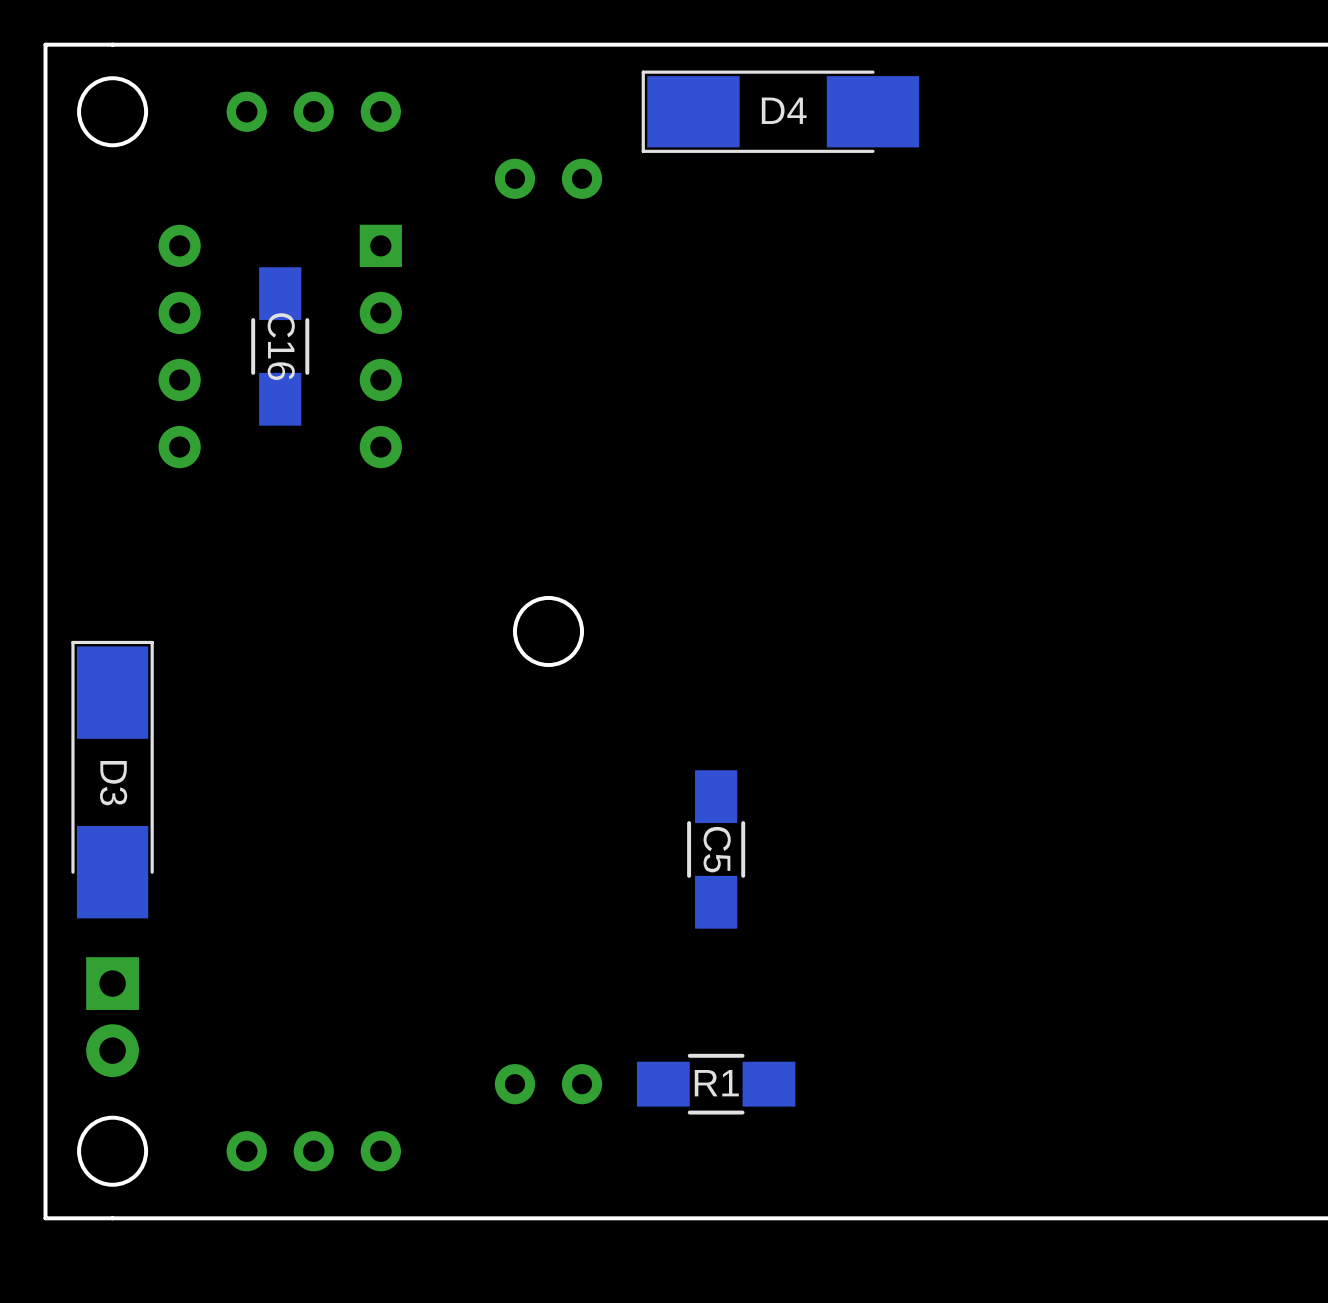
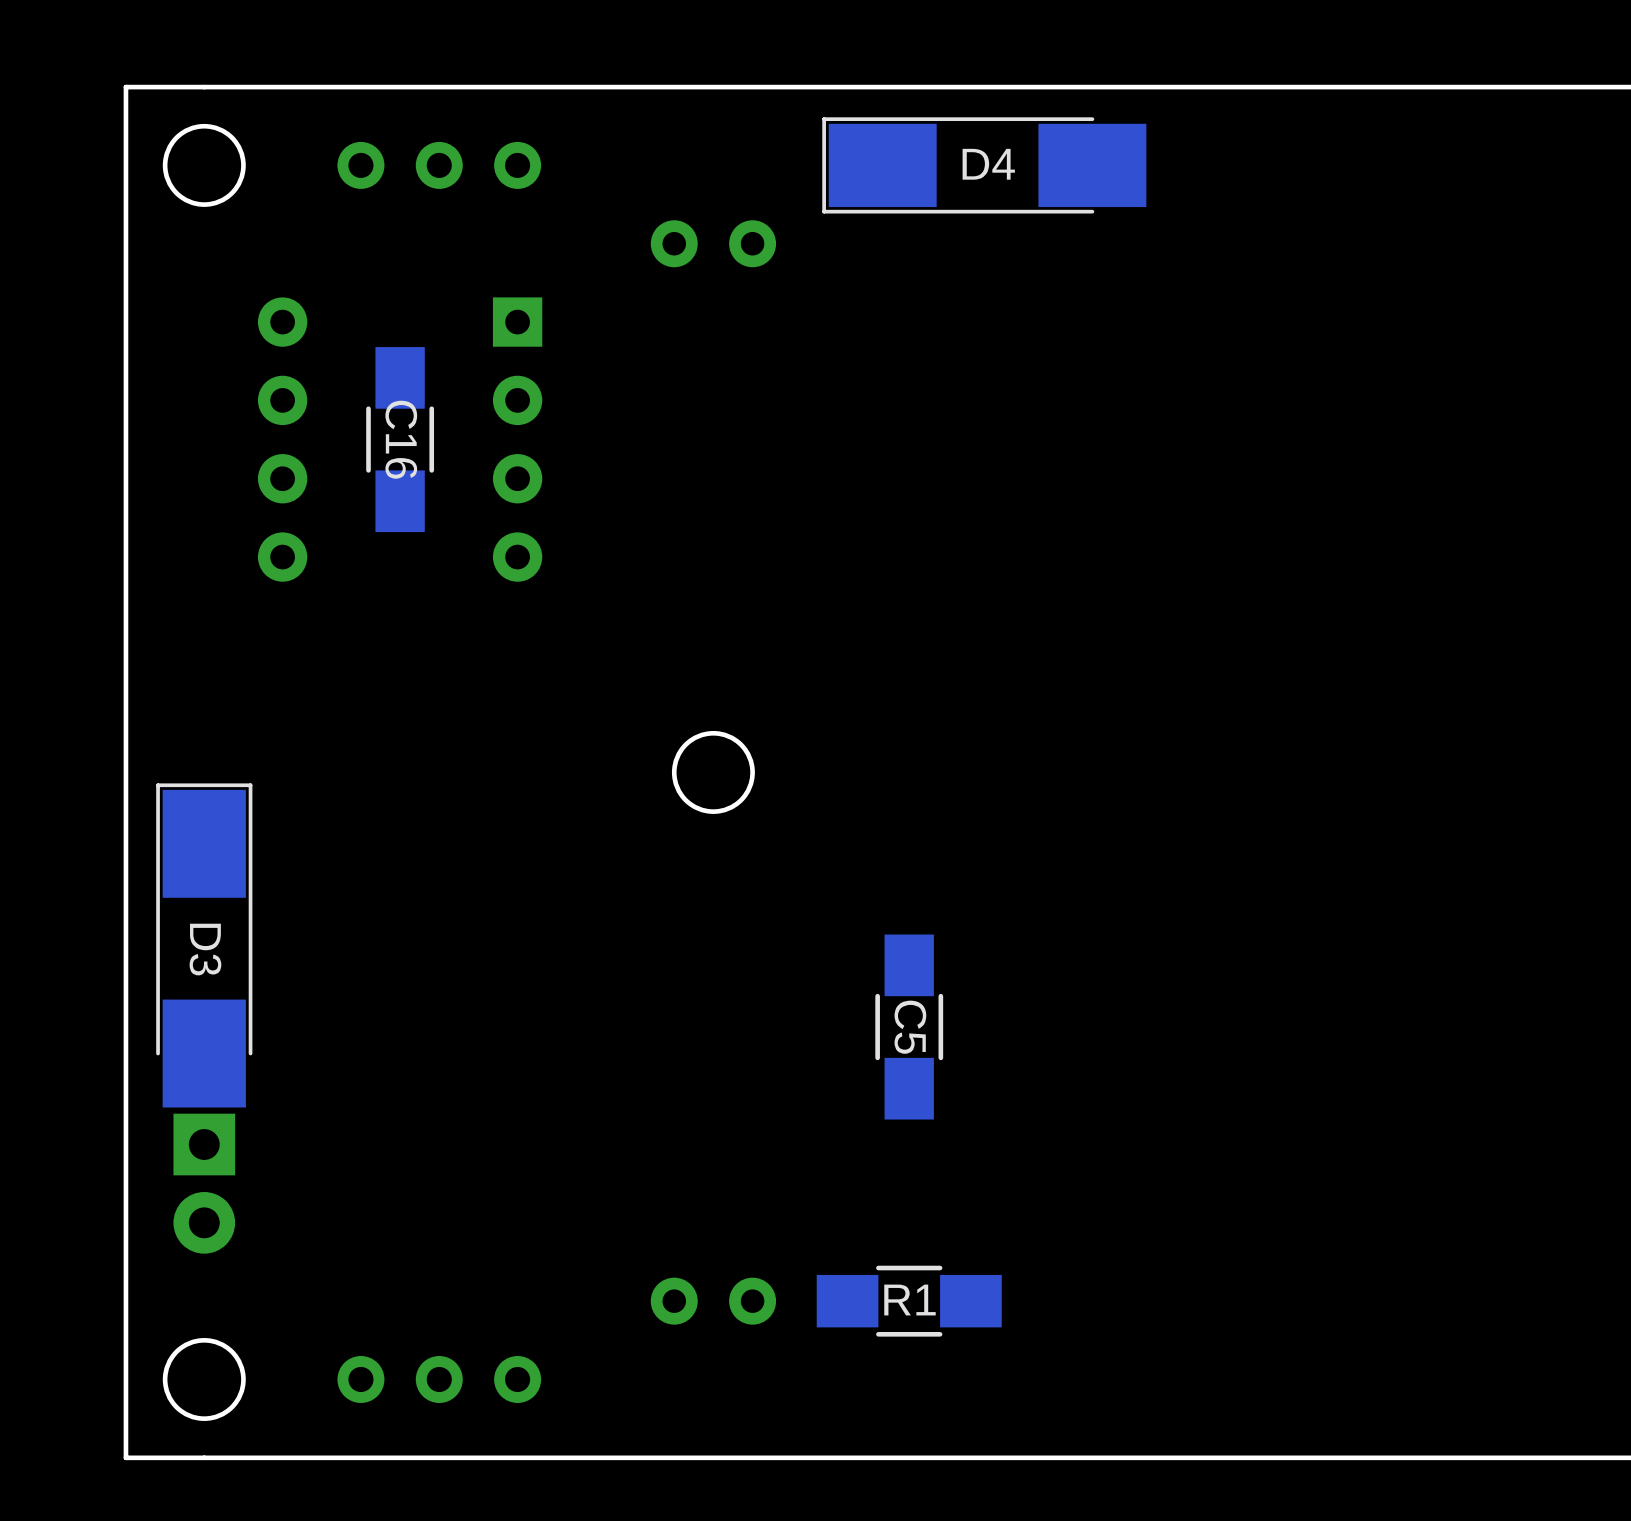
part position: (112, 1017) -> (204, 1183)

